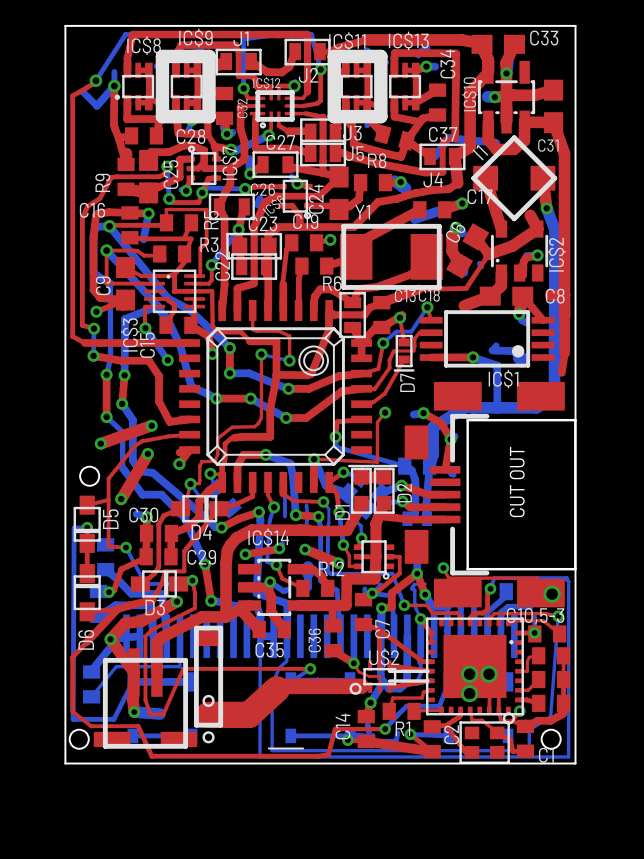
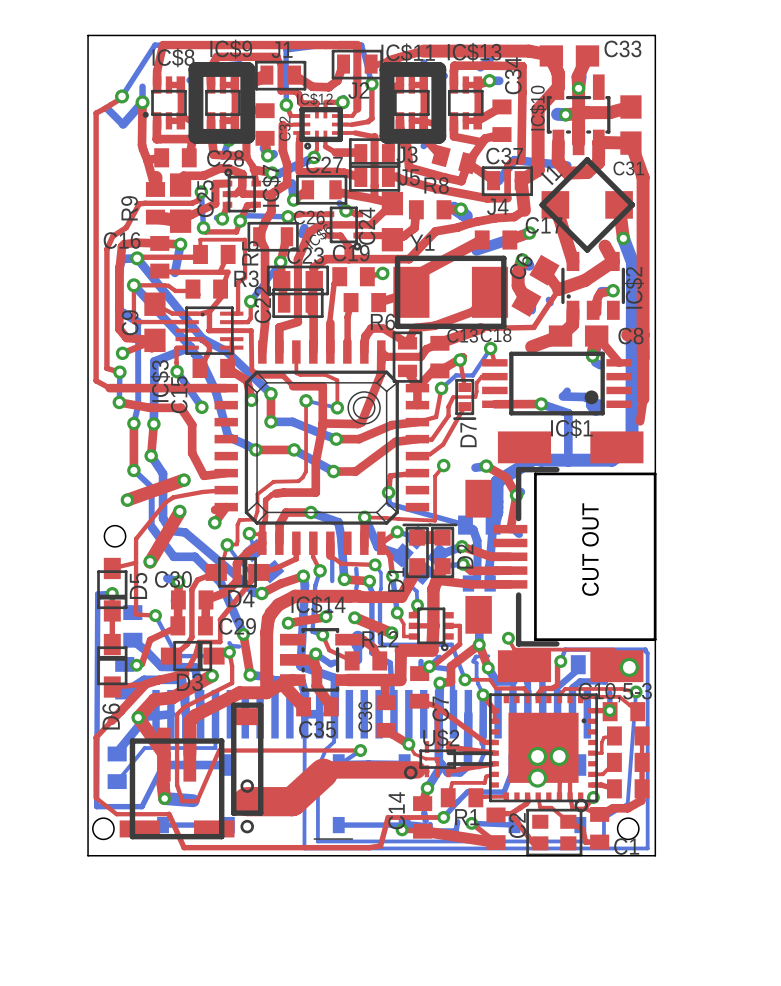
bottom track: none -> (229, 643) (231, 646) (239, 646)

